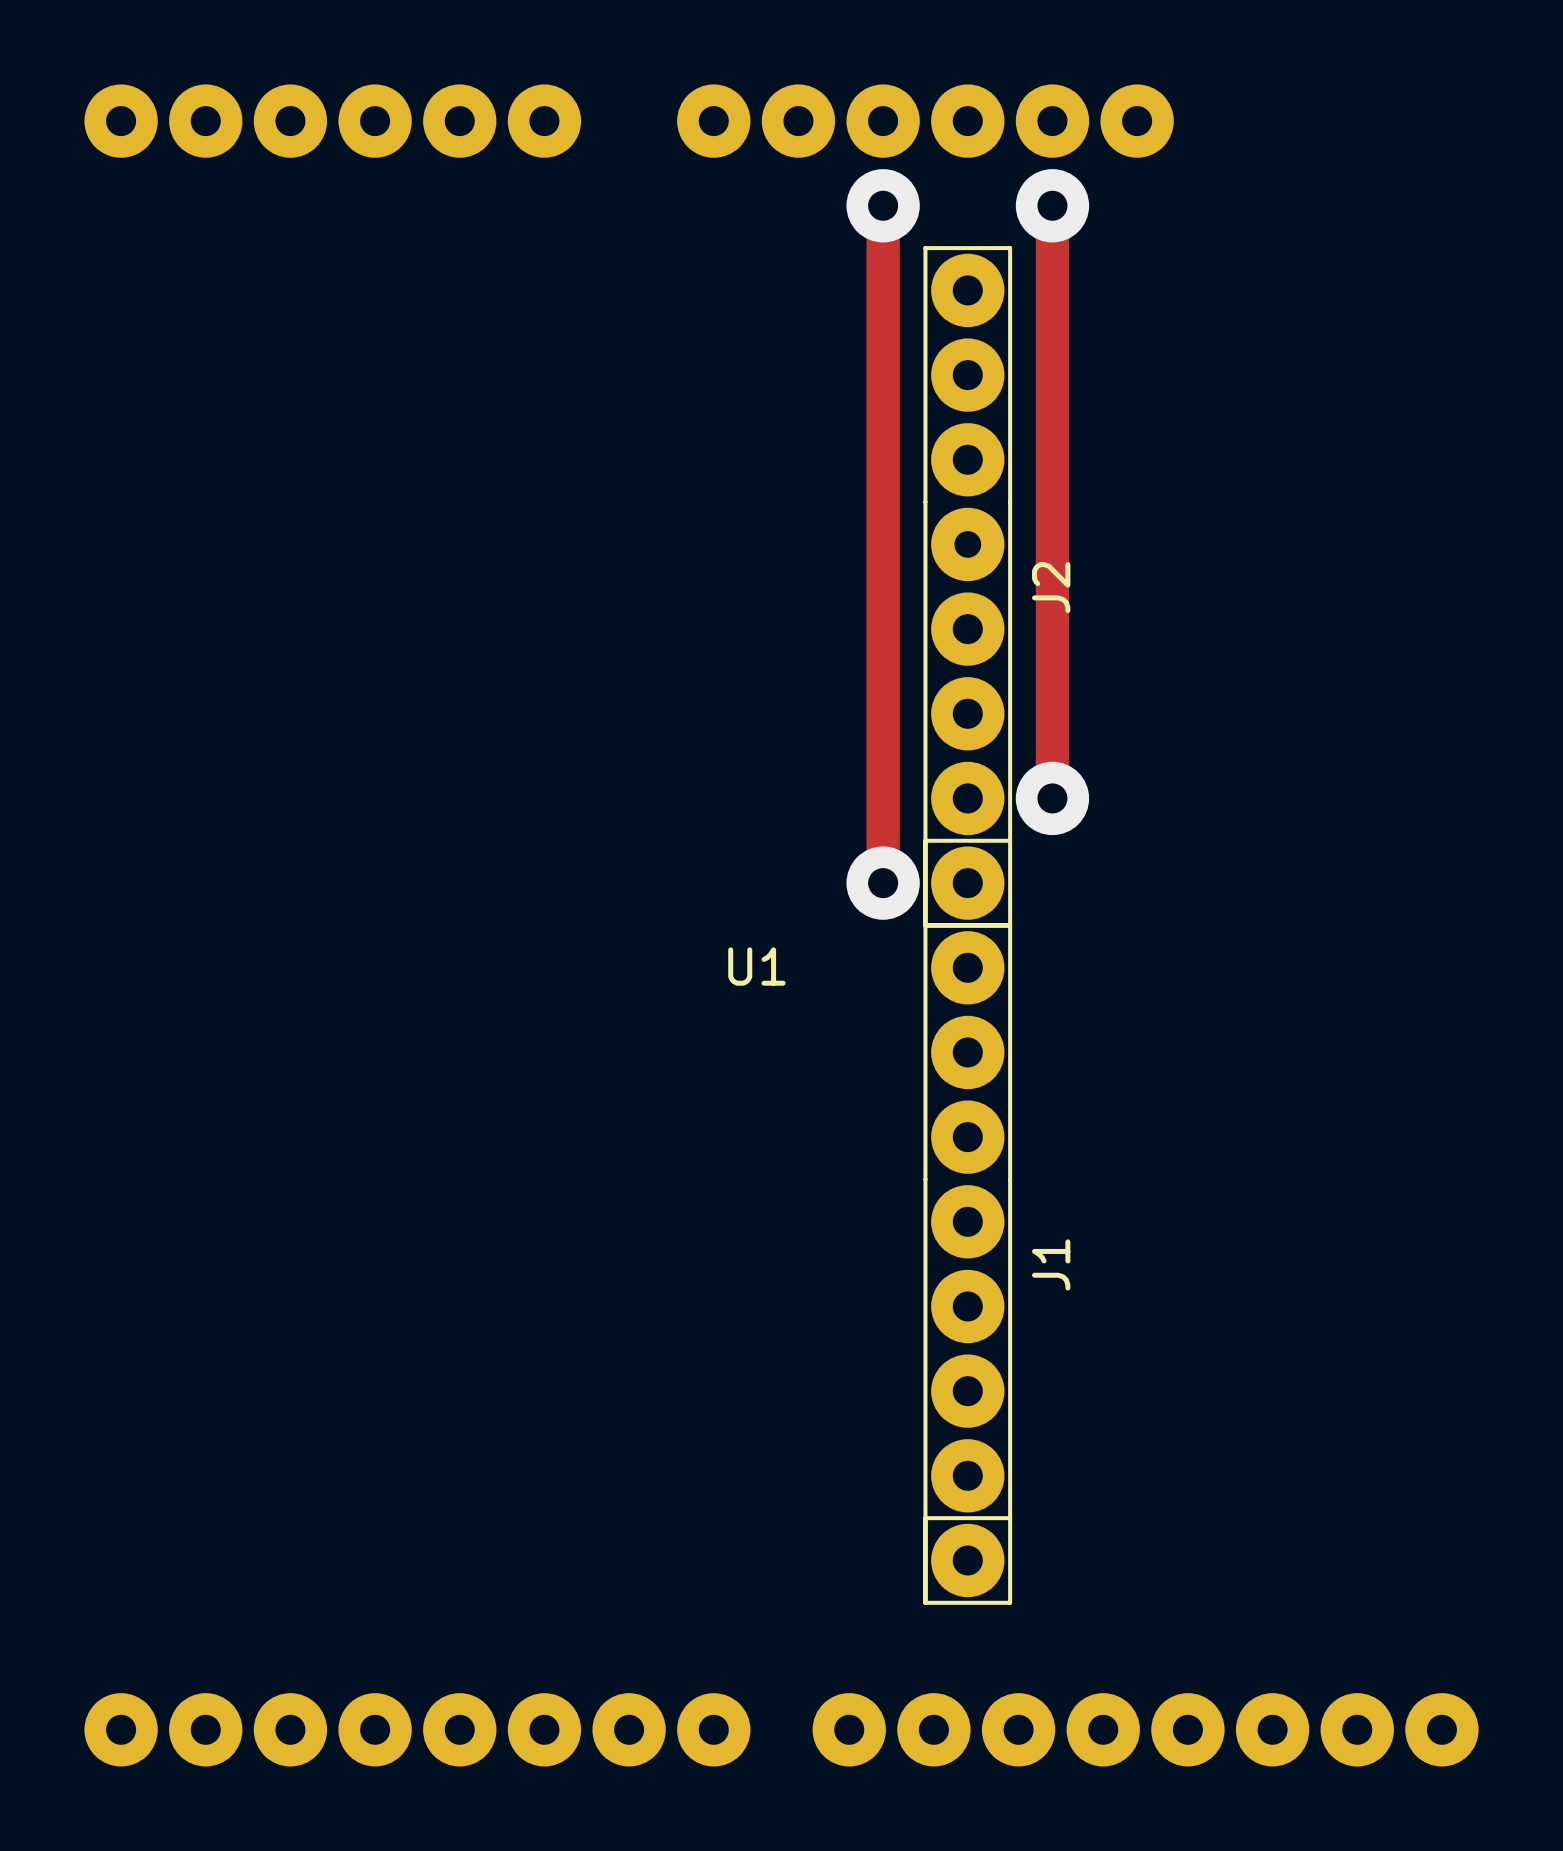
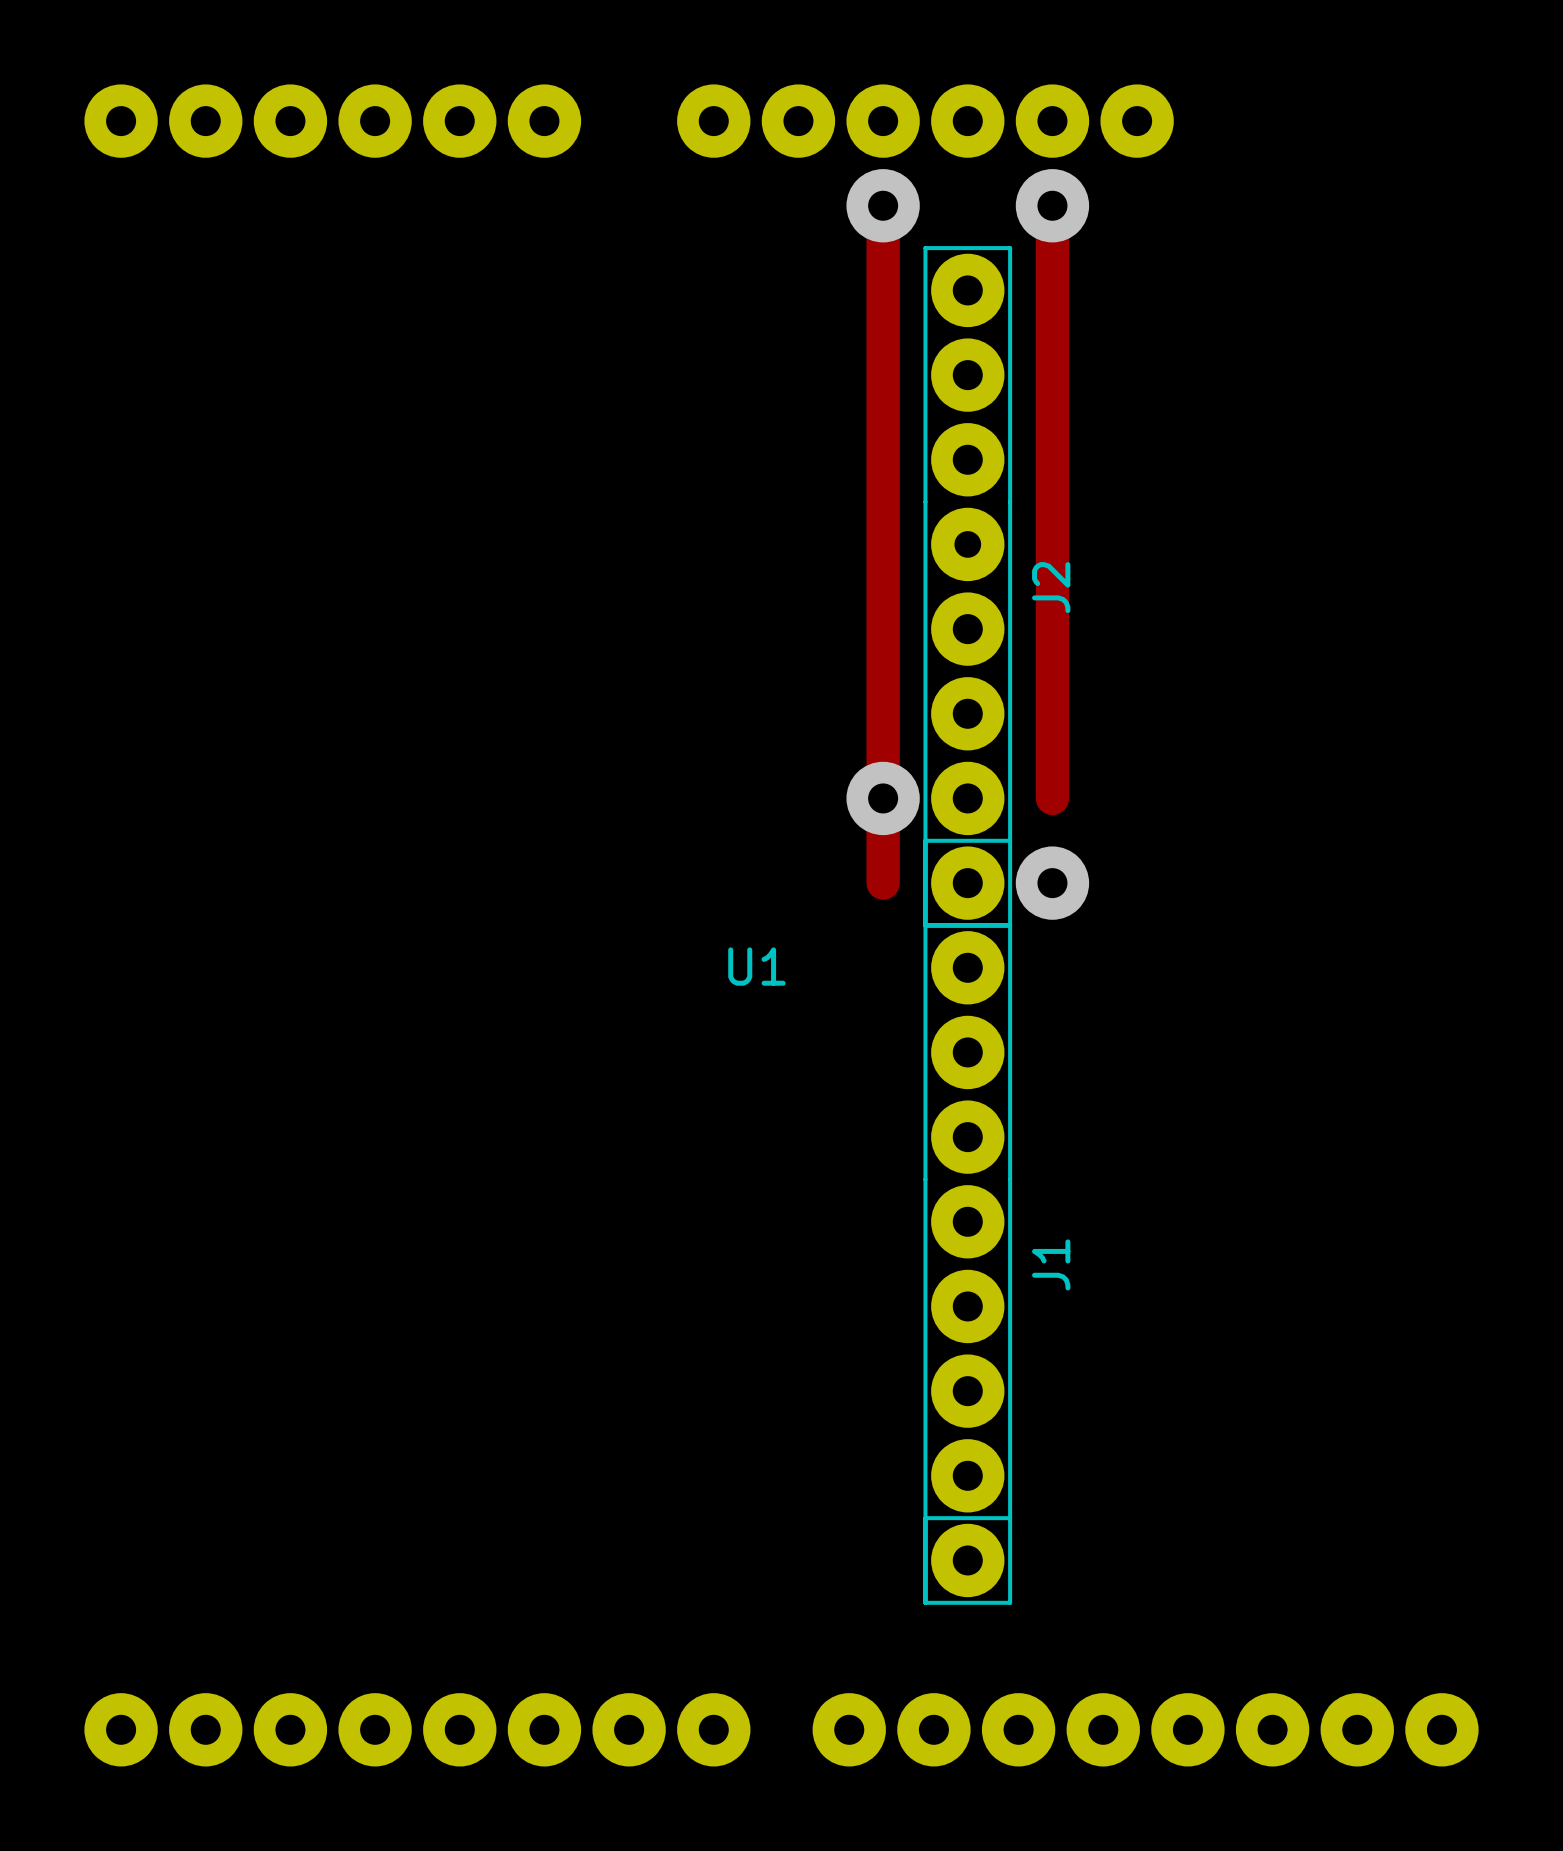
via: none -> (883, 798)
via: (1052, 798) -> none
via: (883, 883) -> none
via: none -> (1052, 883)

